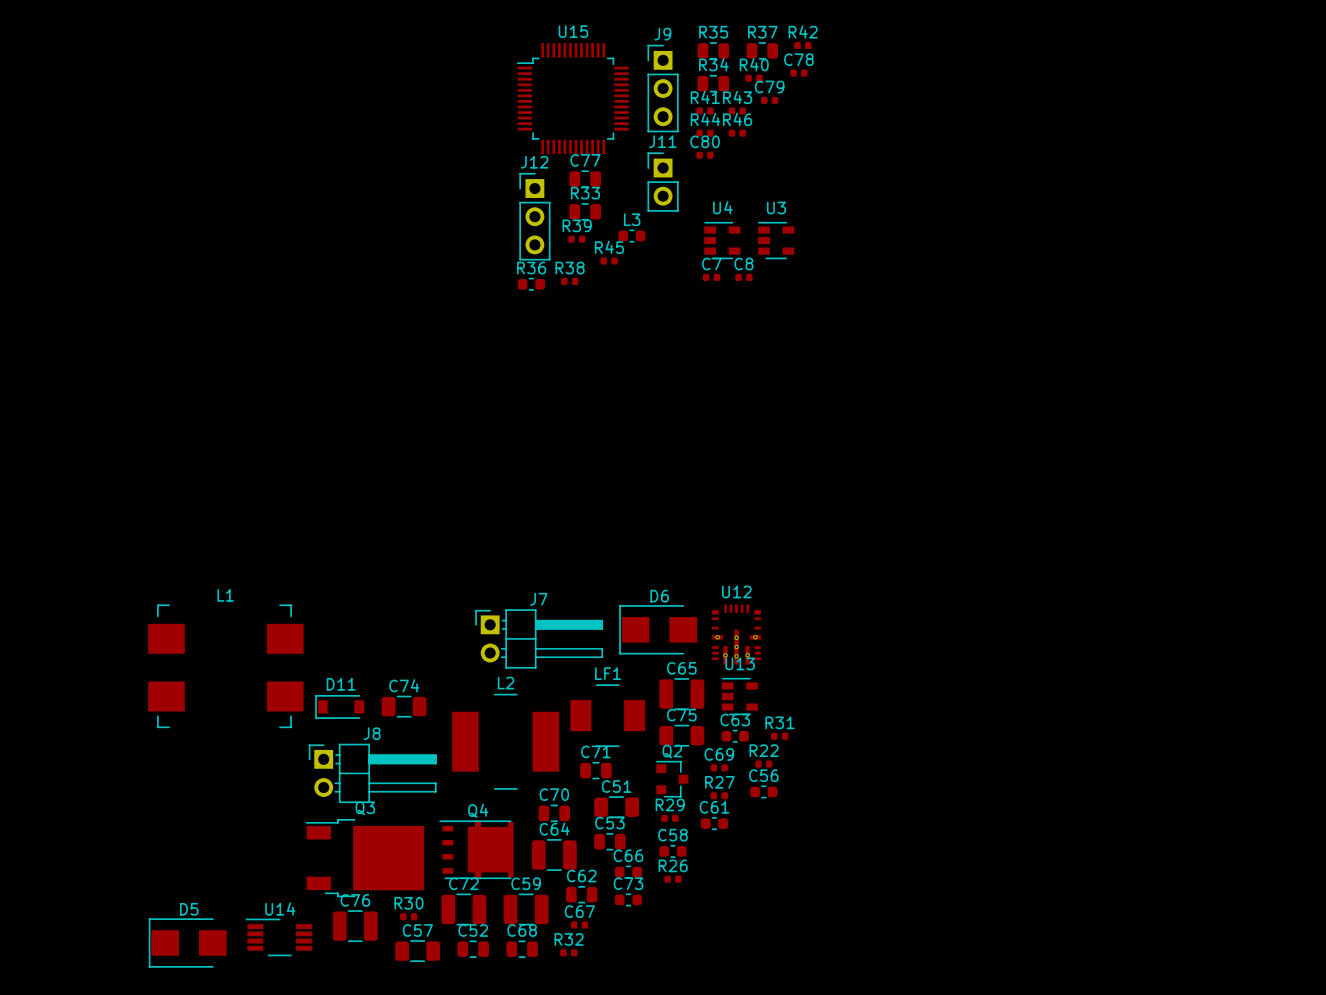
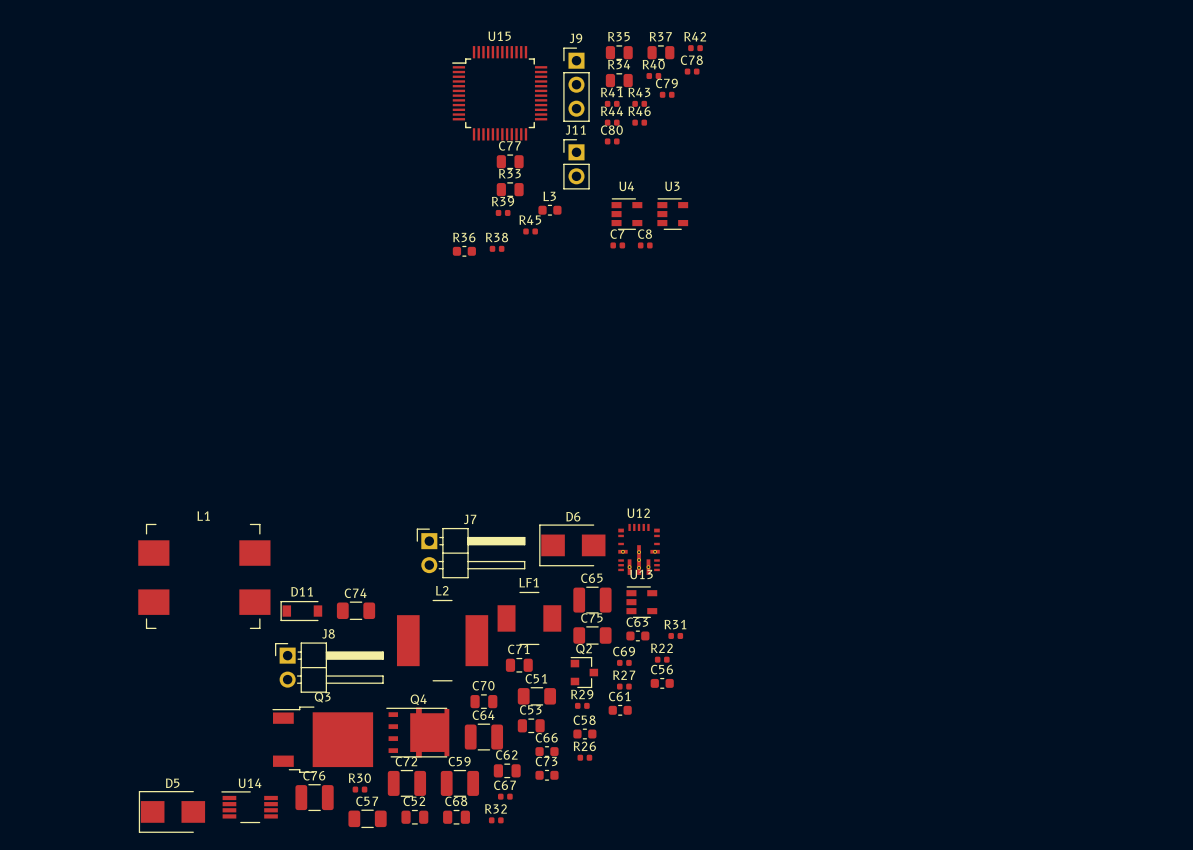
J12: (534, 216) -> none

